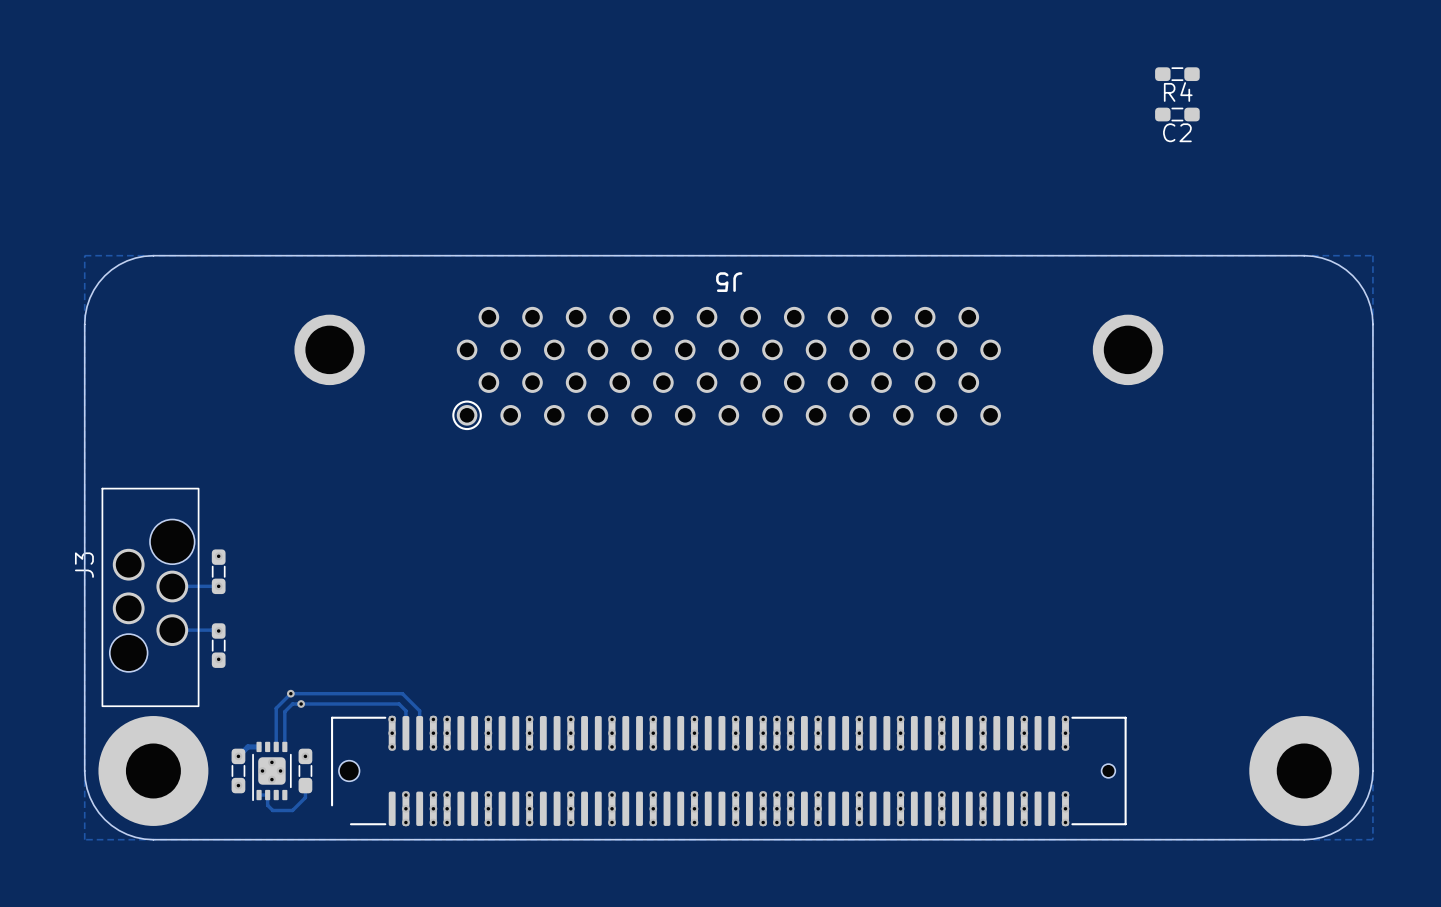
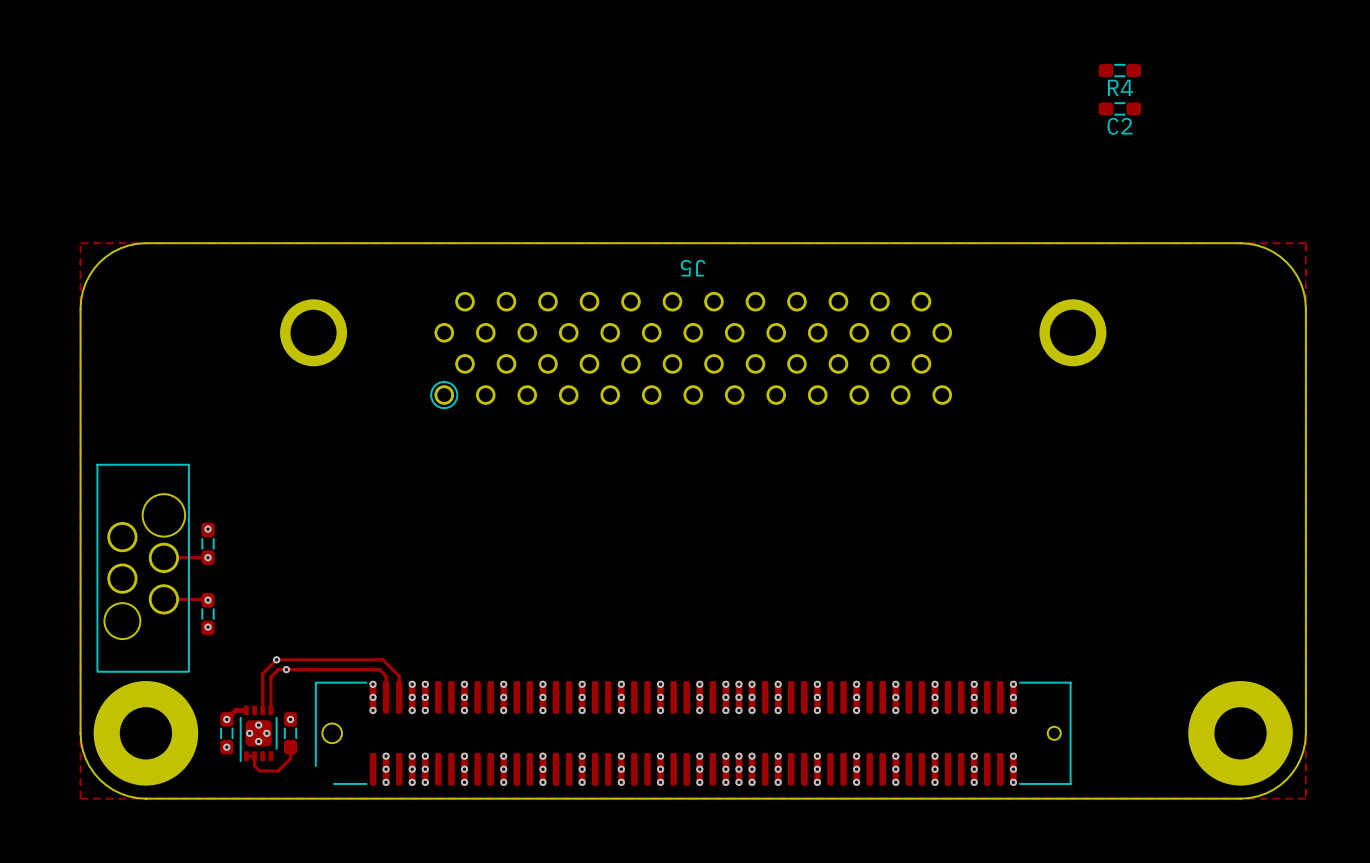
J3 name: J3 (84, 565) -> none

